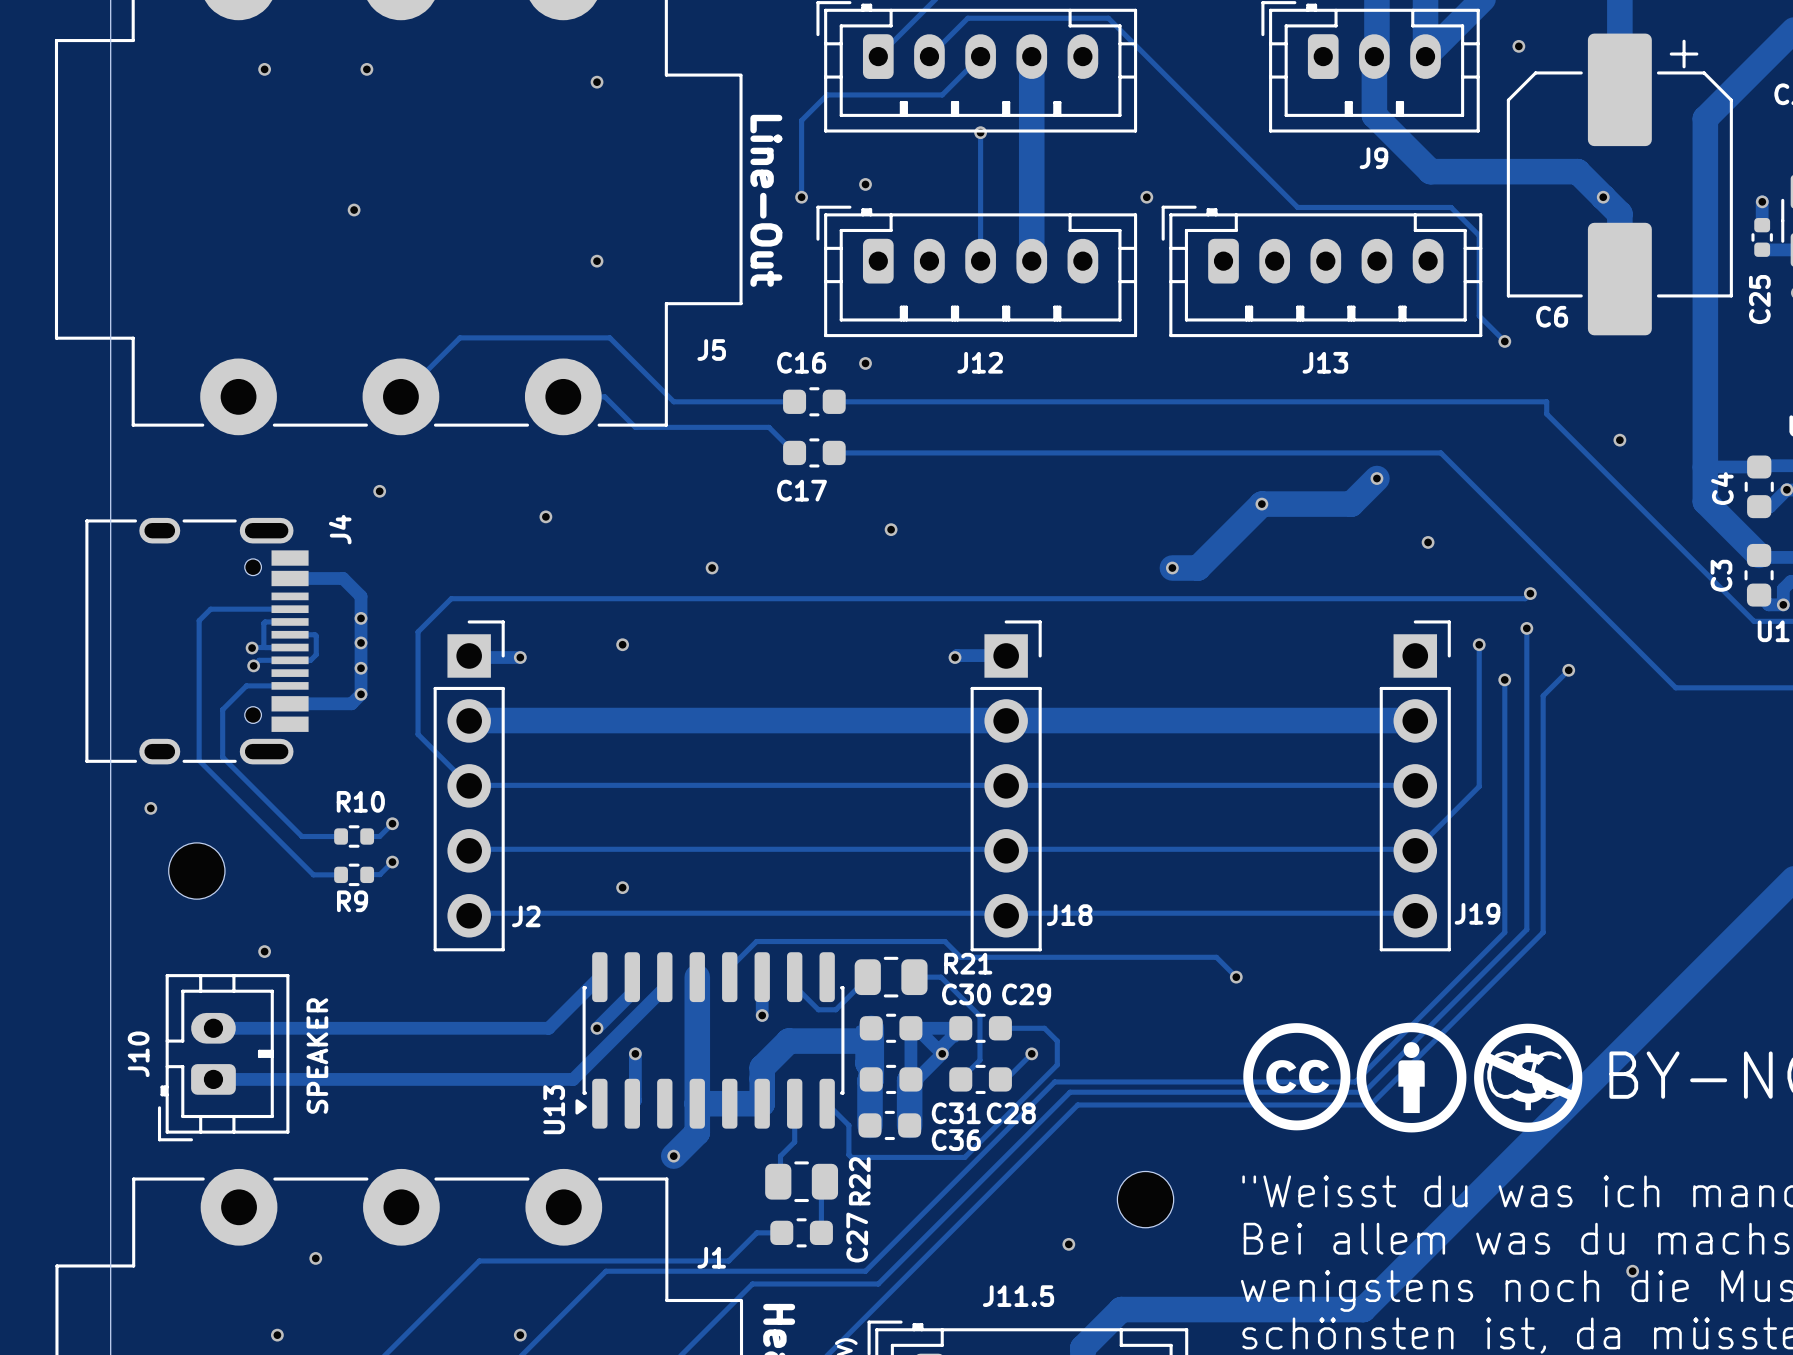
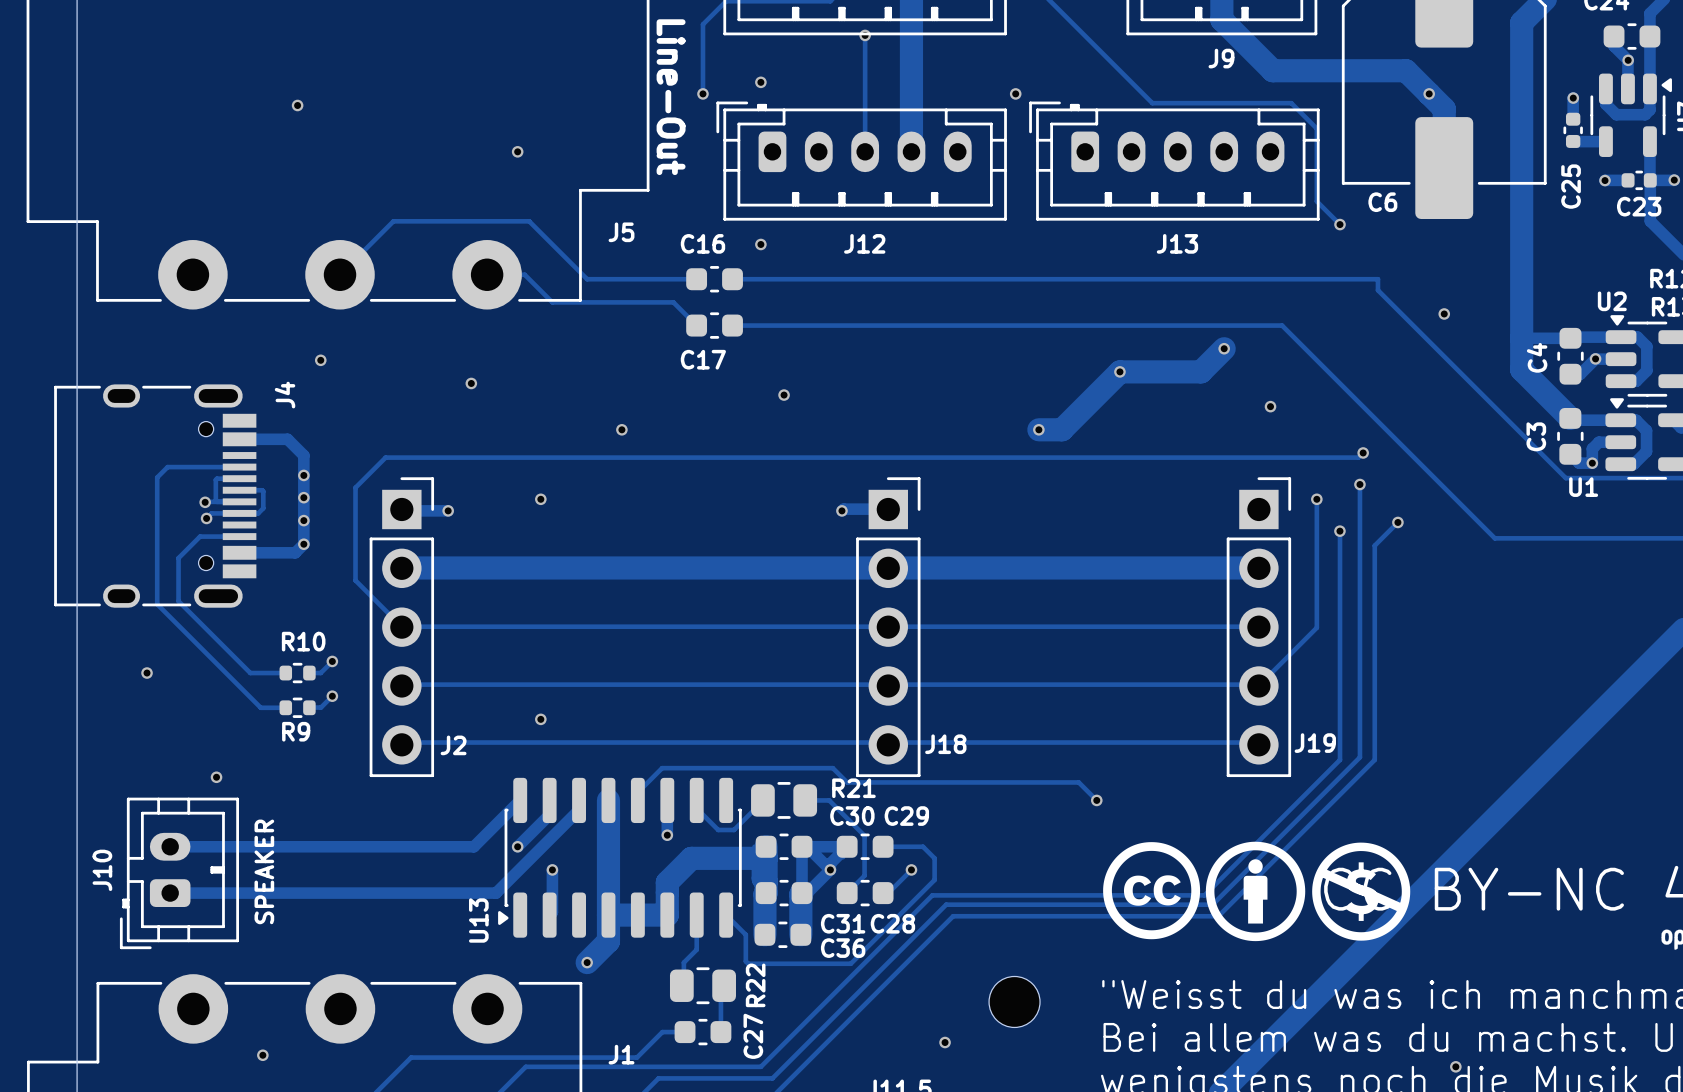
via position: (150, 808) -> (147, 673)
part: (196, 871) -> none

